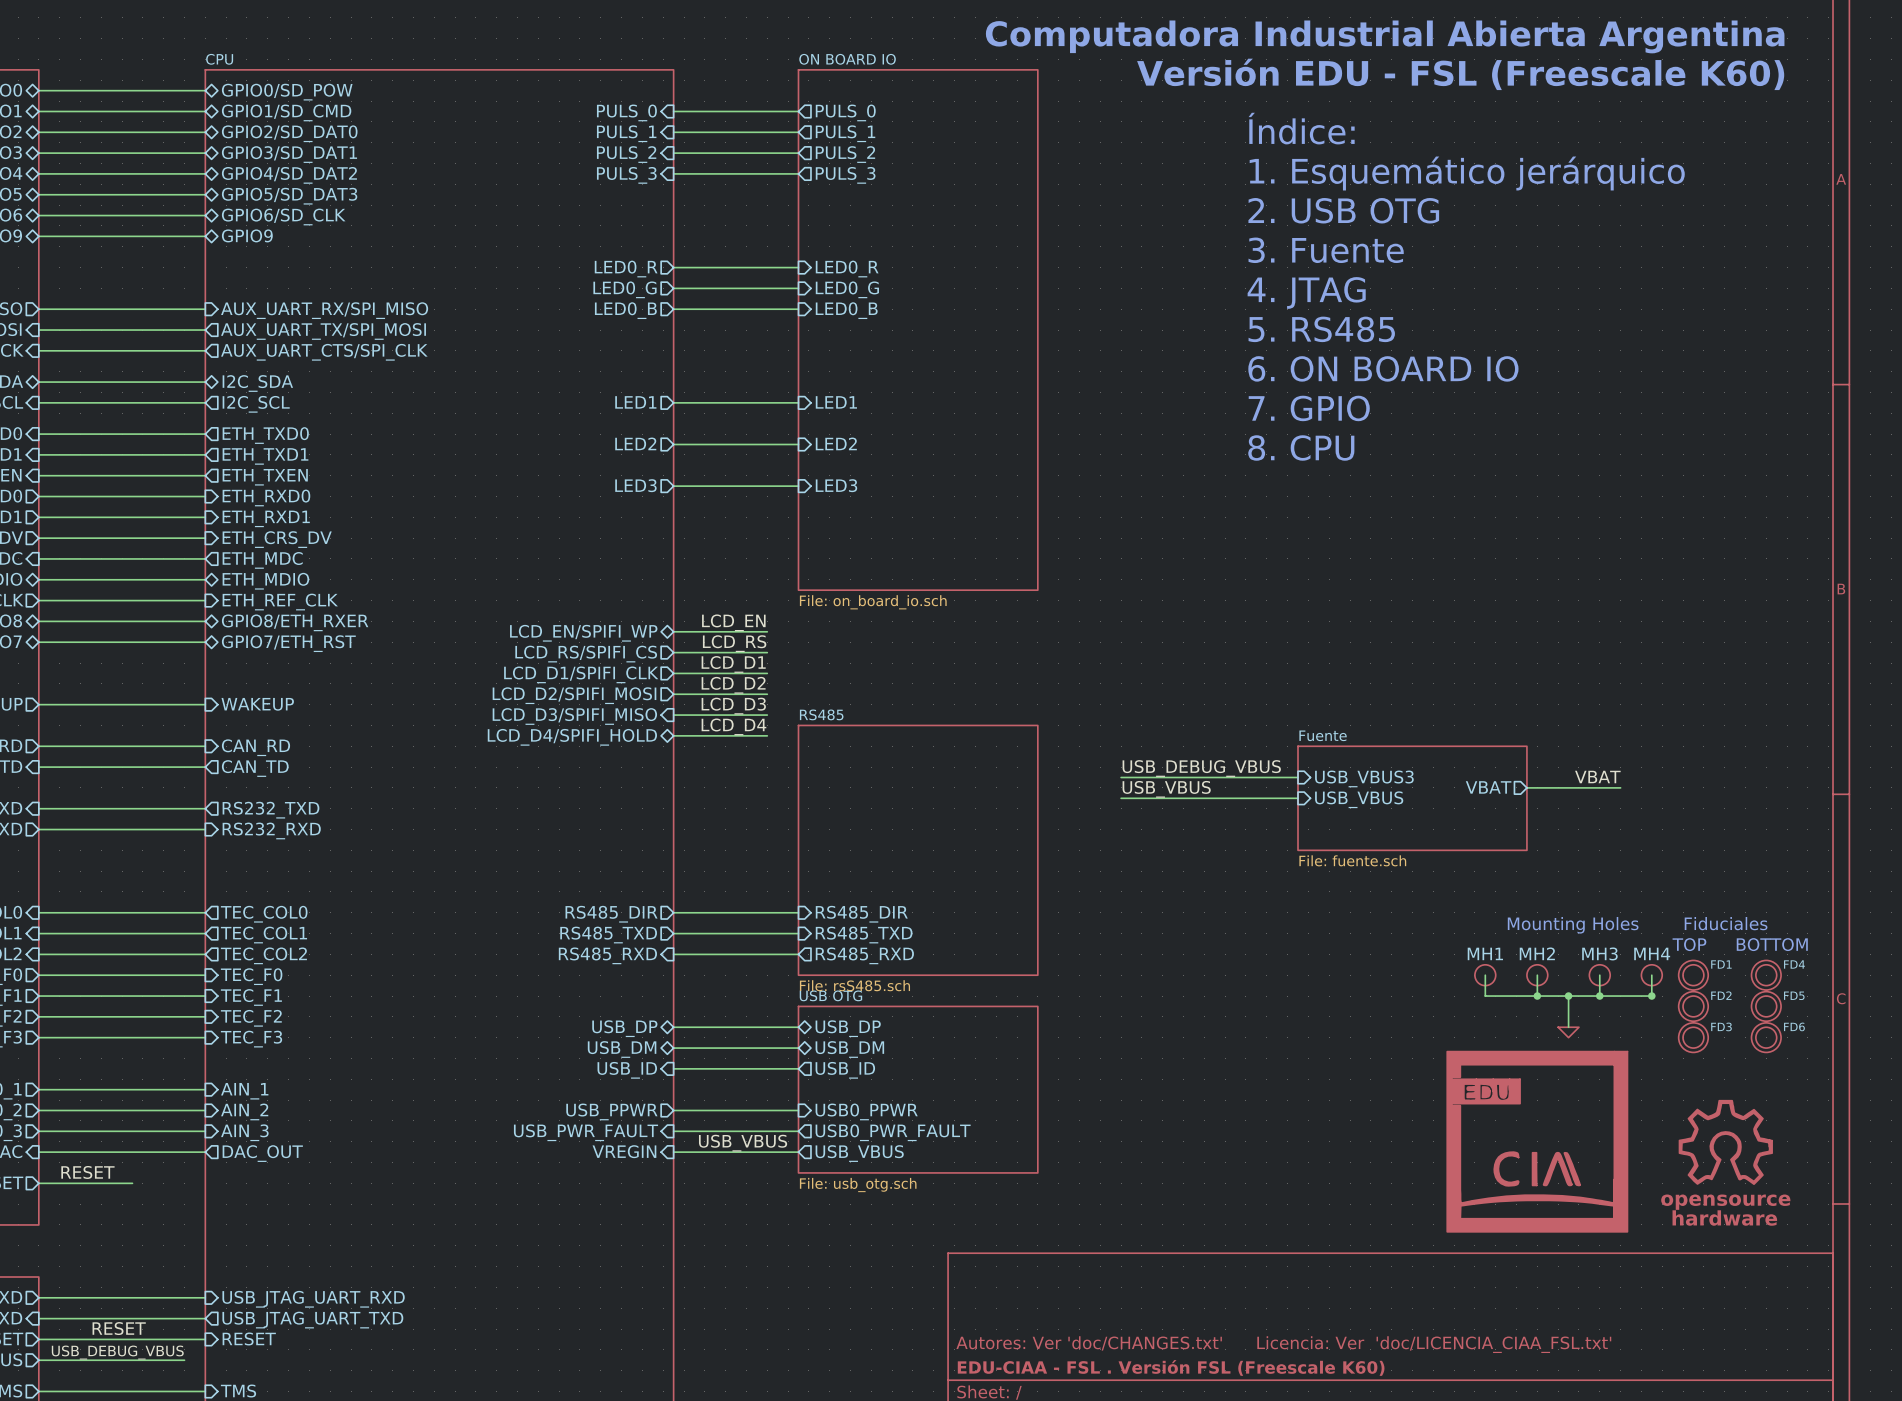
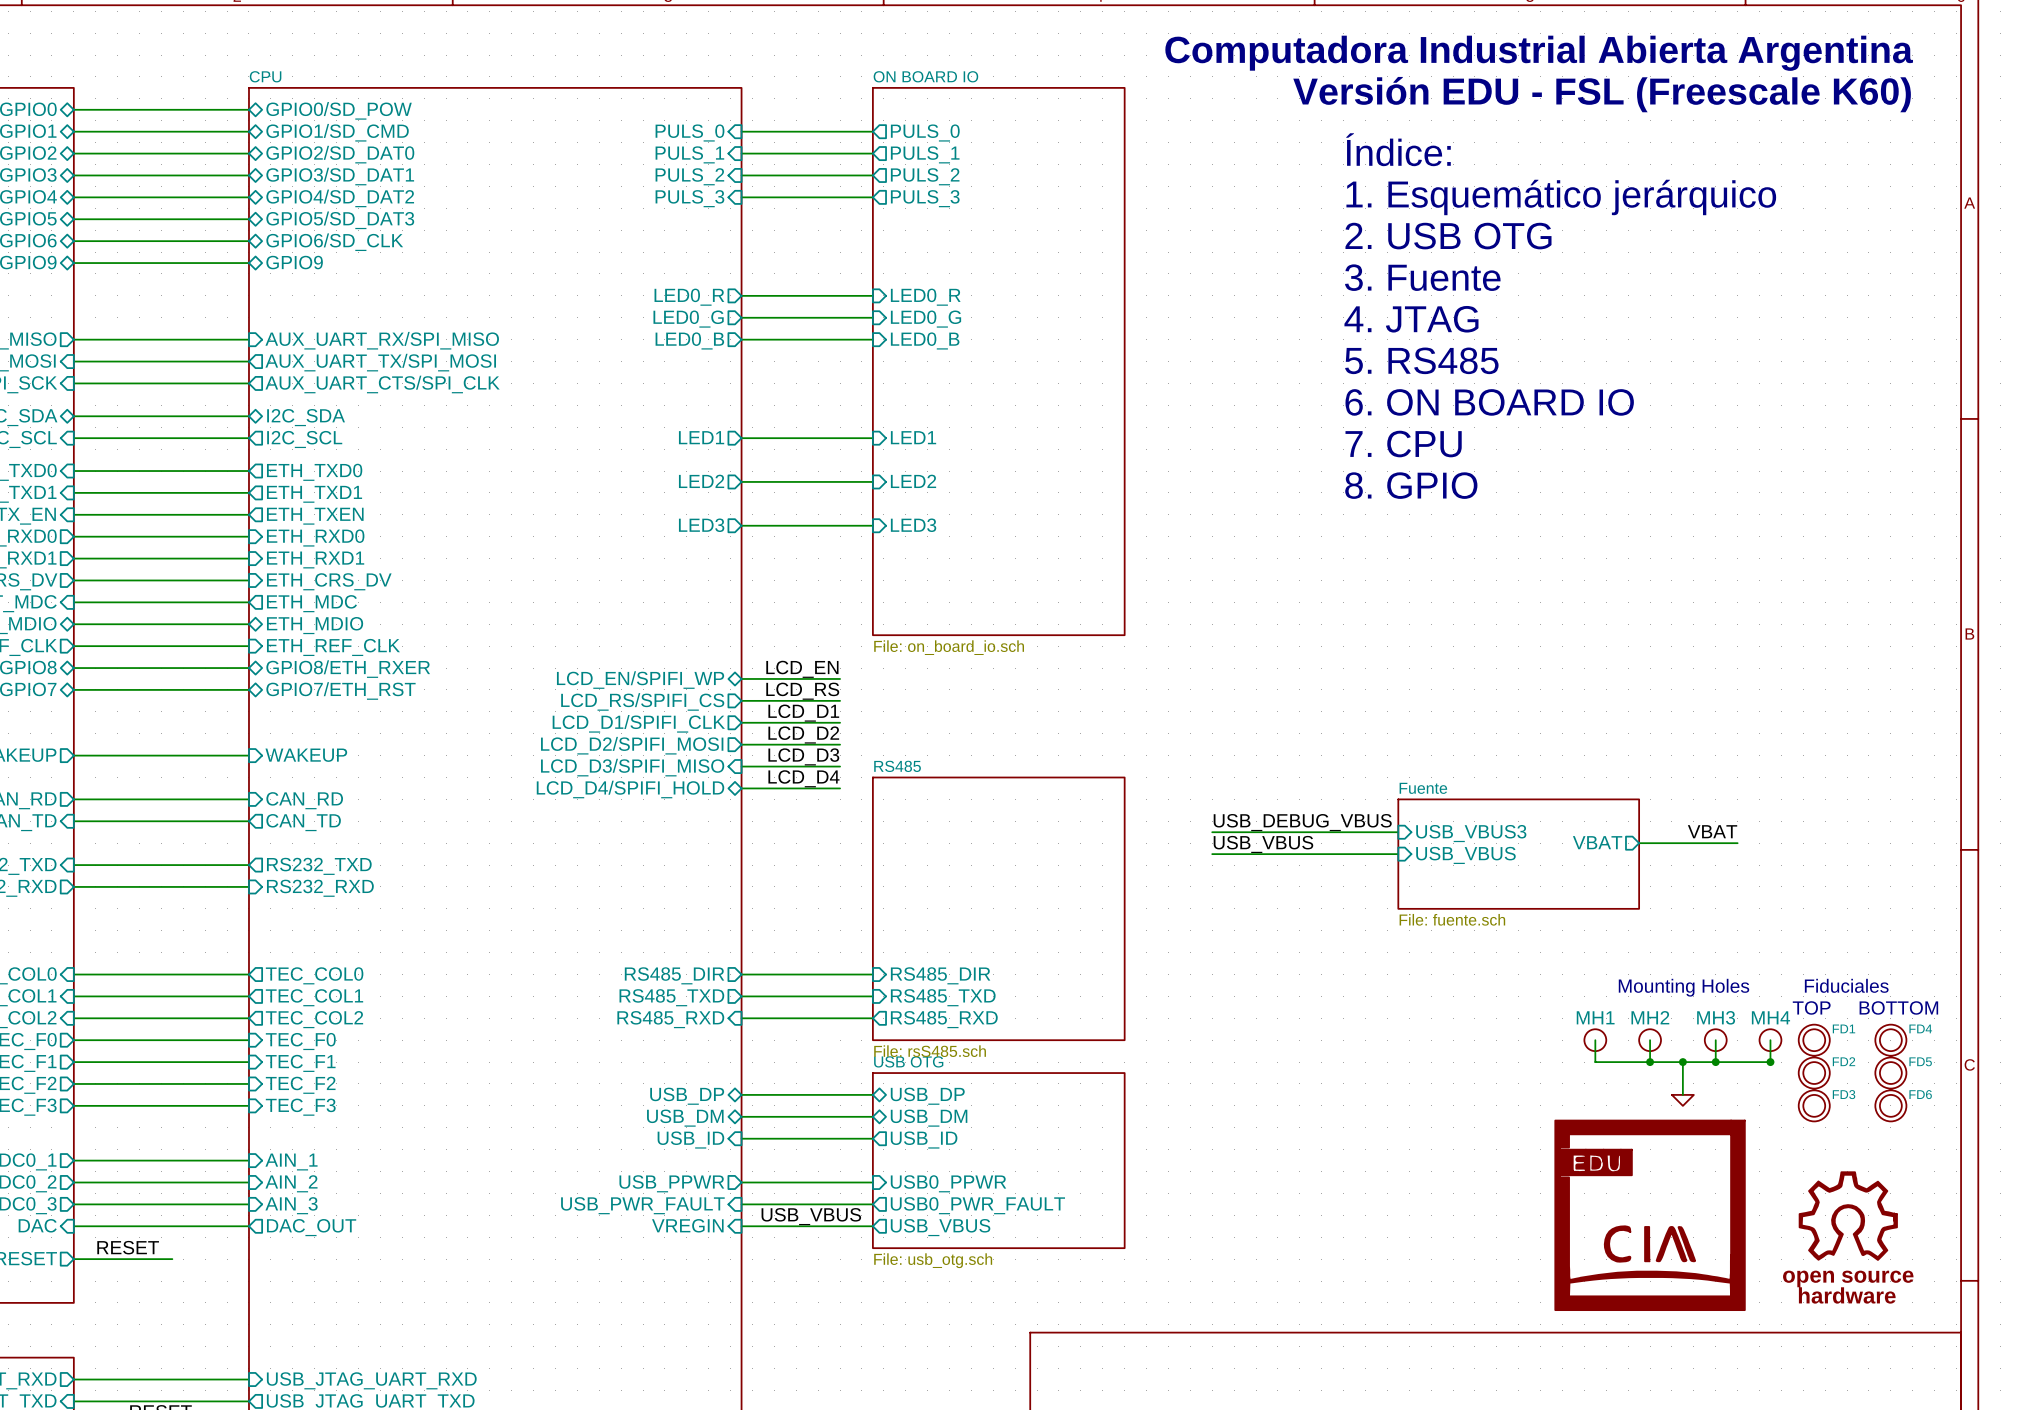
text: 7. GPIO (1309, 408) -> 7. CPU (1403, 444)
text: 8. CPU (1301, 447) -> 8. GPIO (1411, 485)

